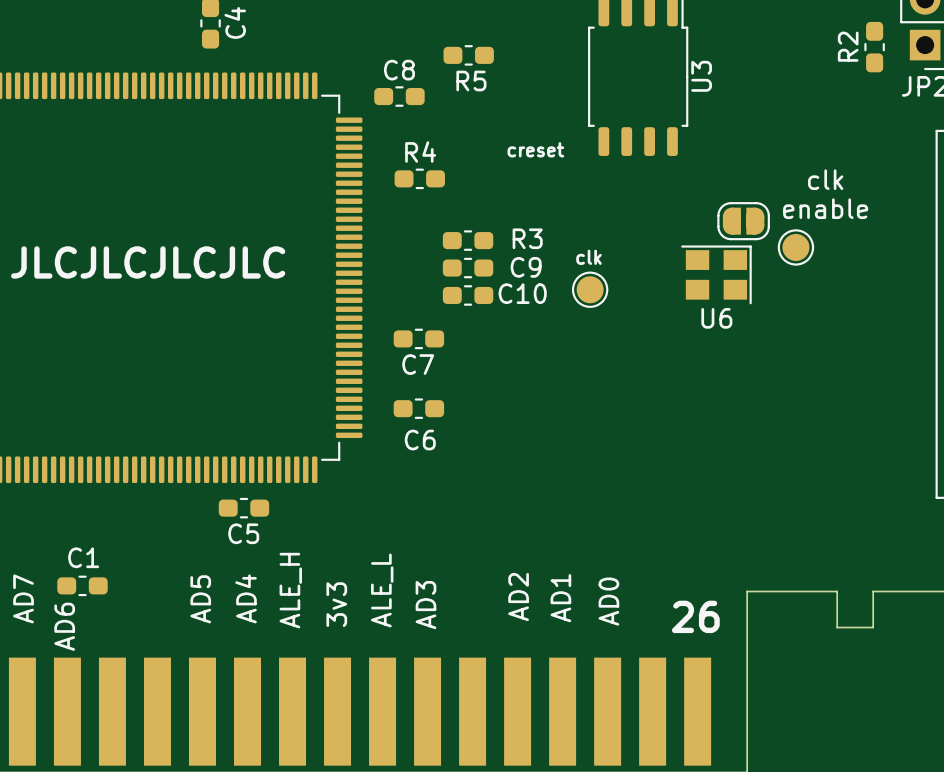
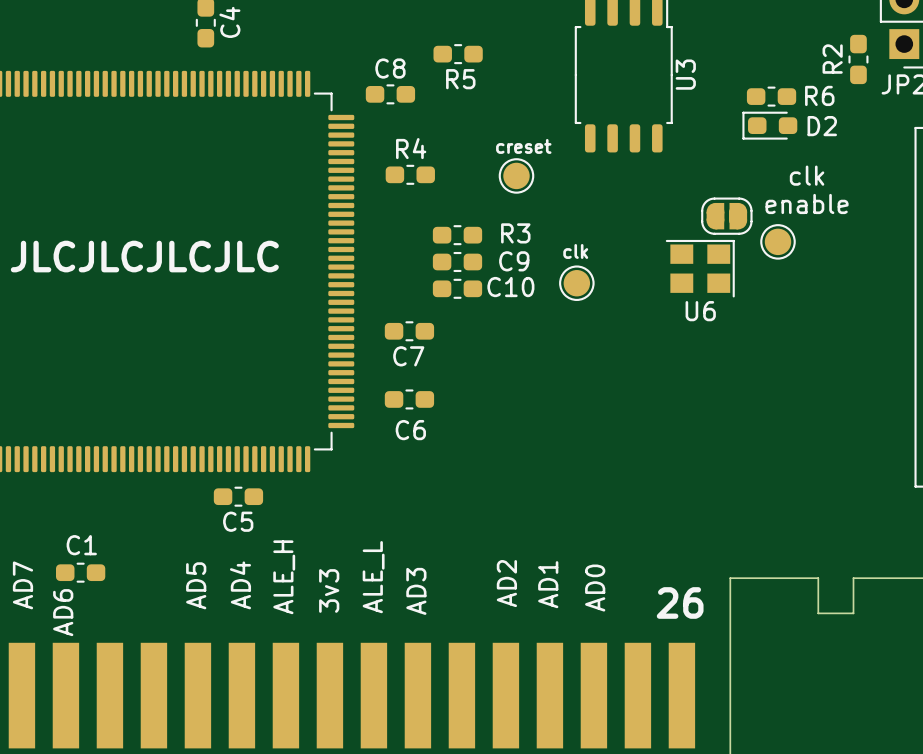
R2 position: (874, 47) -> (858, 59)
R6: none -> (771, 96)
D2: none -> (769, 125)
part: none -> (516, 175)

